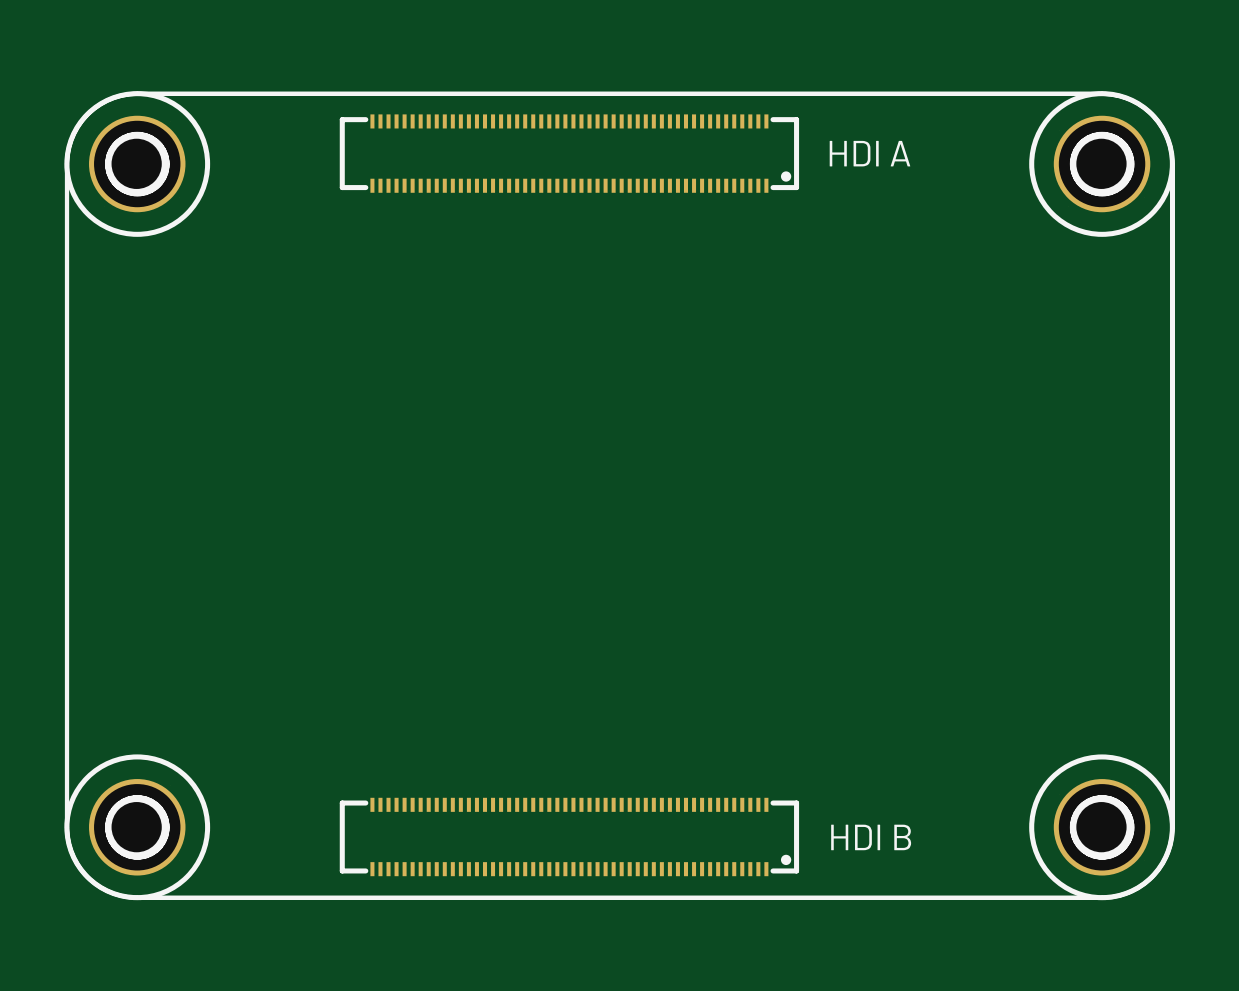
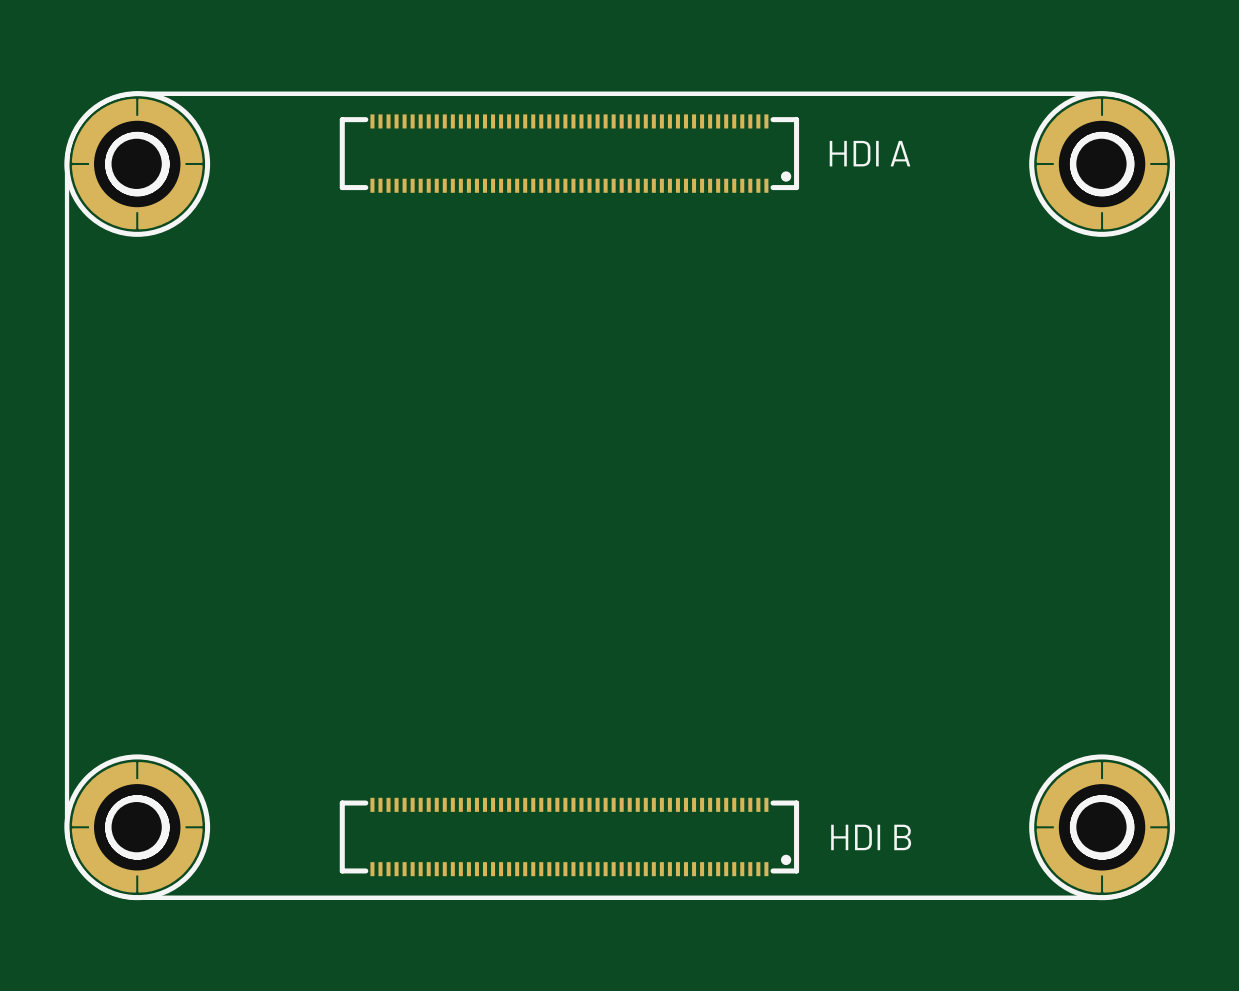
part footprint: [64, 91, 211, 237] -> [64, 91, 211, 237]
part footprint: [1029, 91, 1175, 237] -> [1029, 91, 1175, 237]
part footprint: [64, 754, 211, 901] -> [64, 754, 211, 901]
part footprint: [1029, 754, 1175, 901] -> [1029, 754, 1175, 901]

